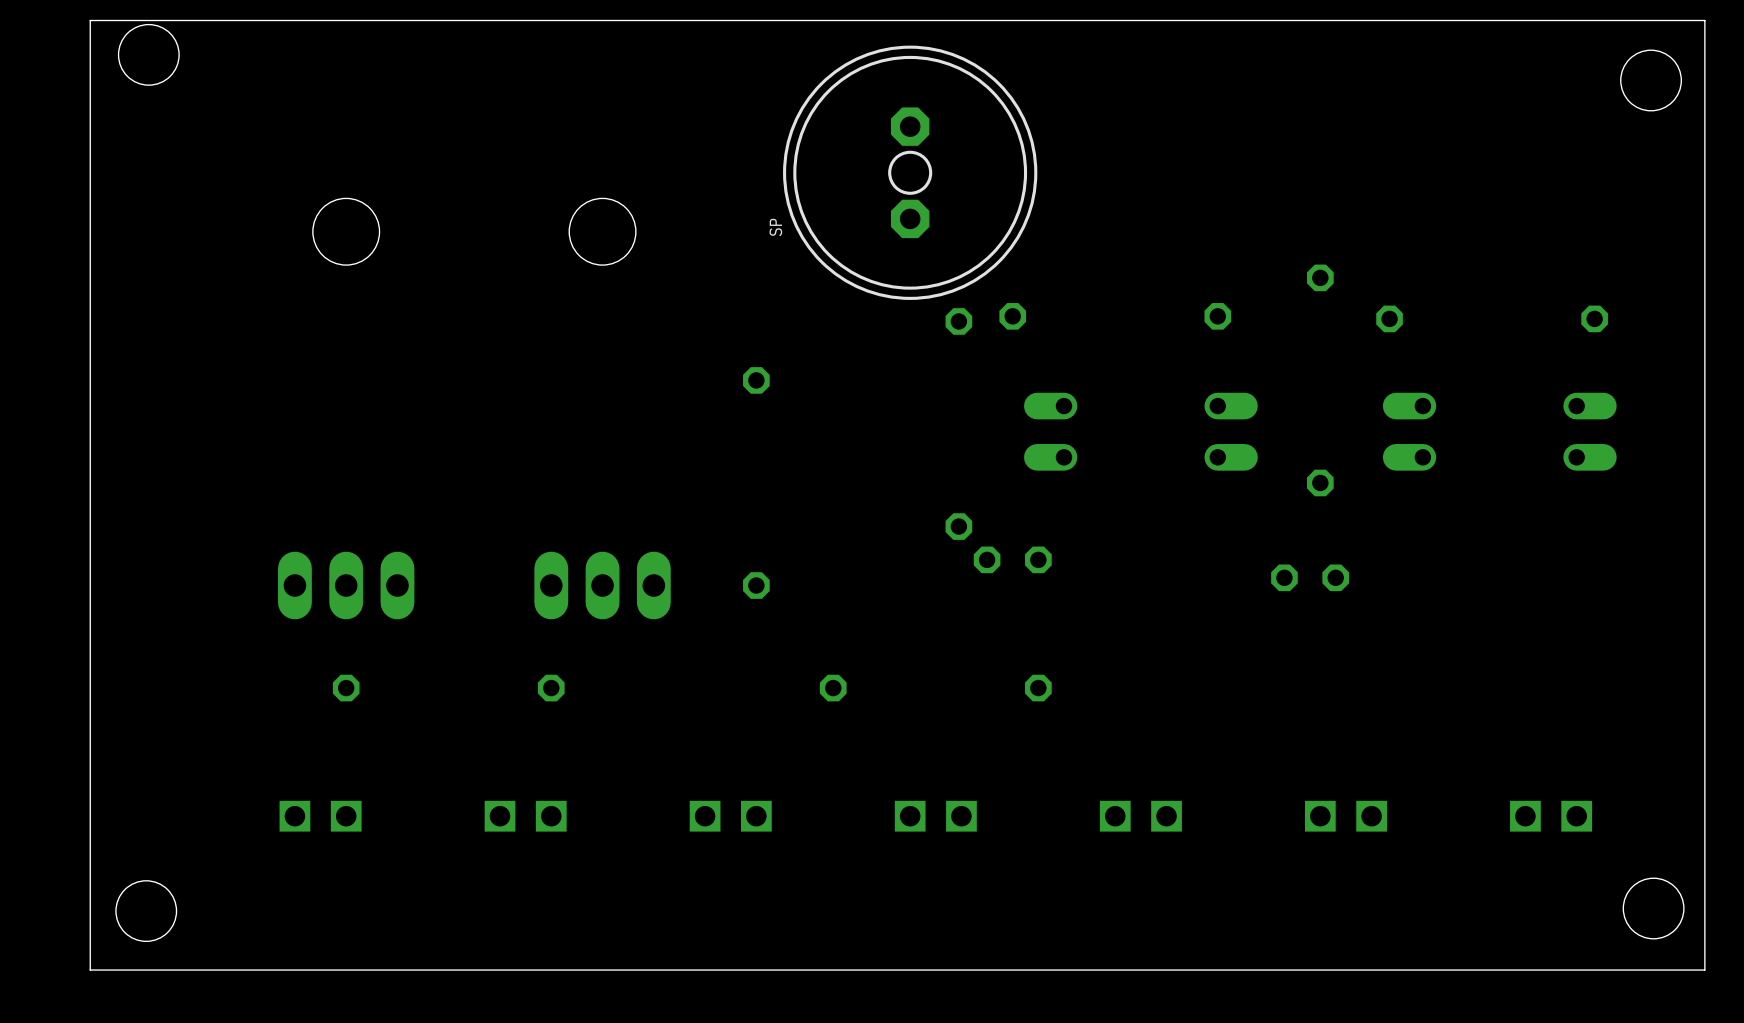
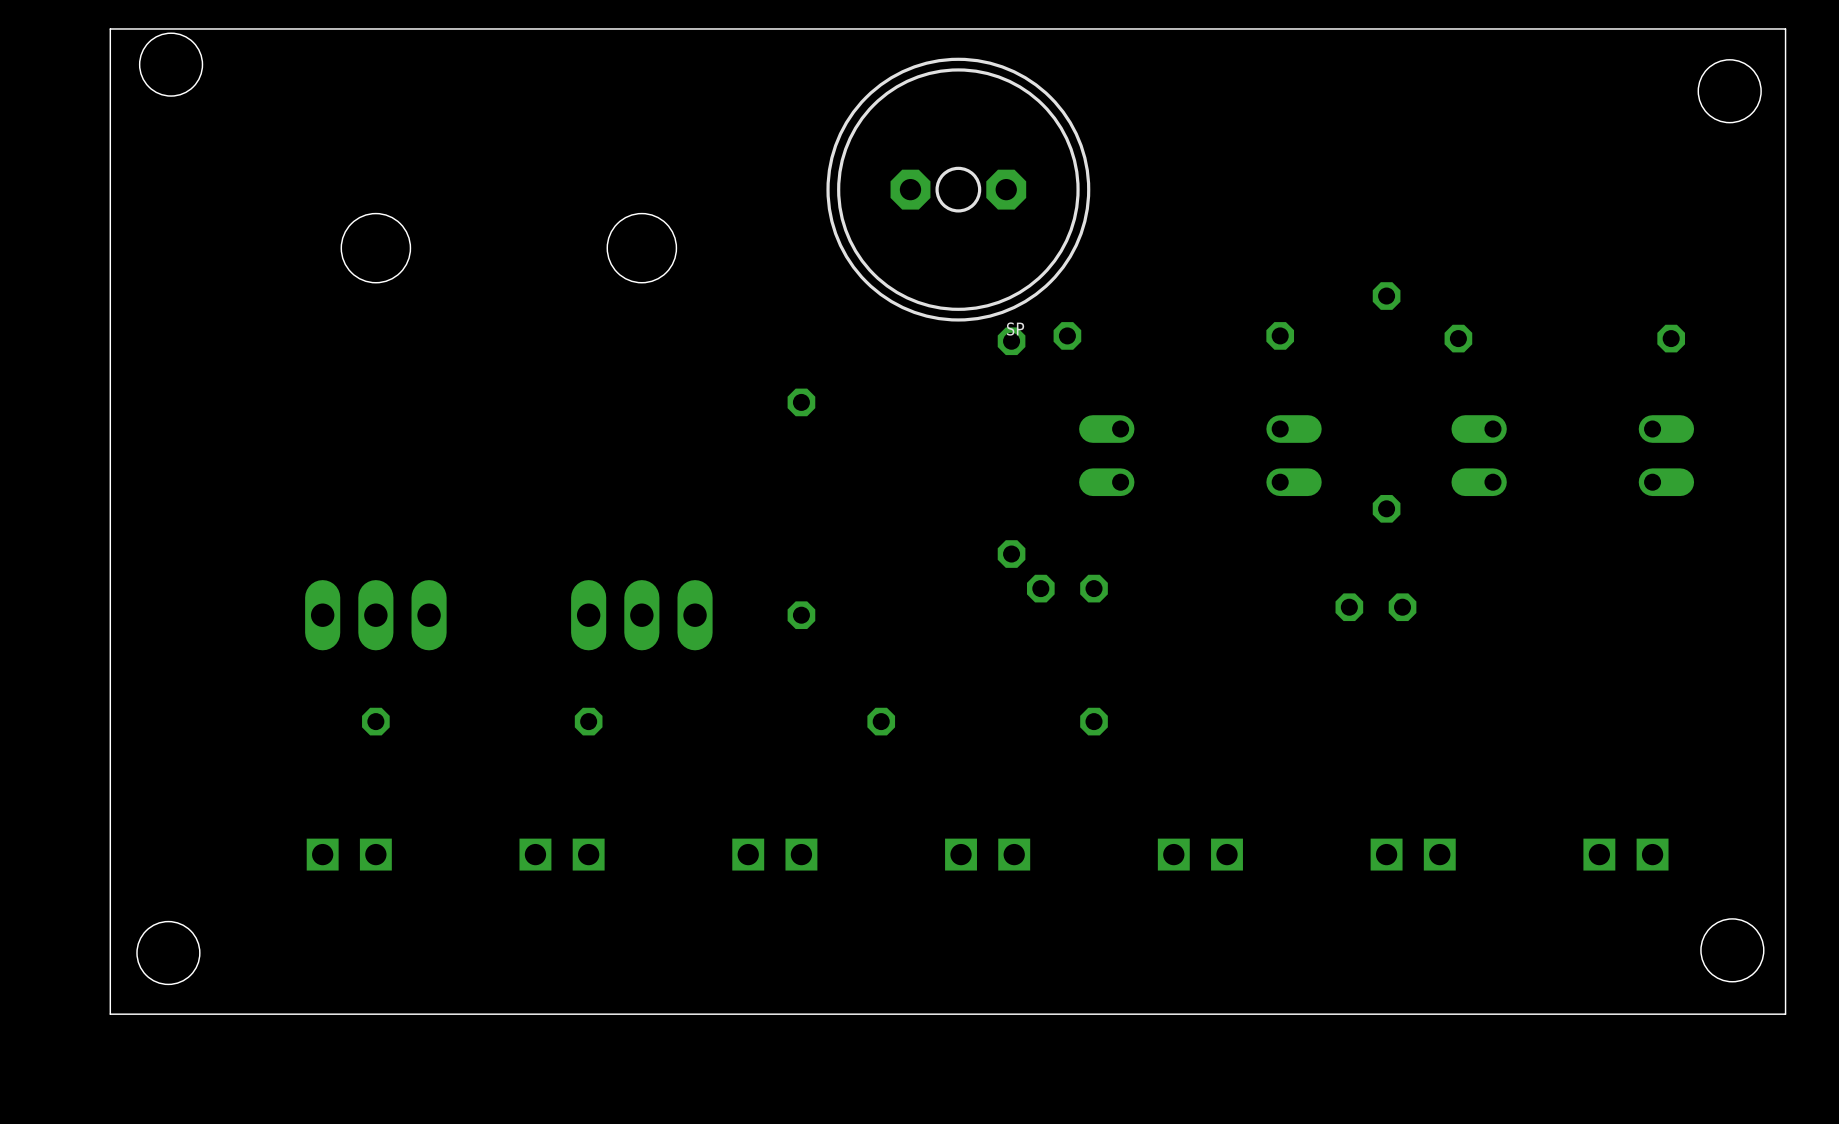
SP rotation: 0° (910, 172) -> 90° clockwise (958, 189)
SP name position: SP (775, 227) -> SP (1015, 329)

